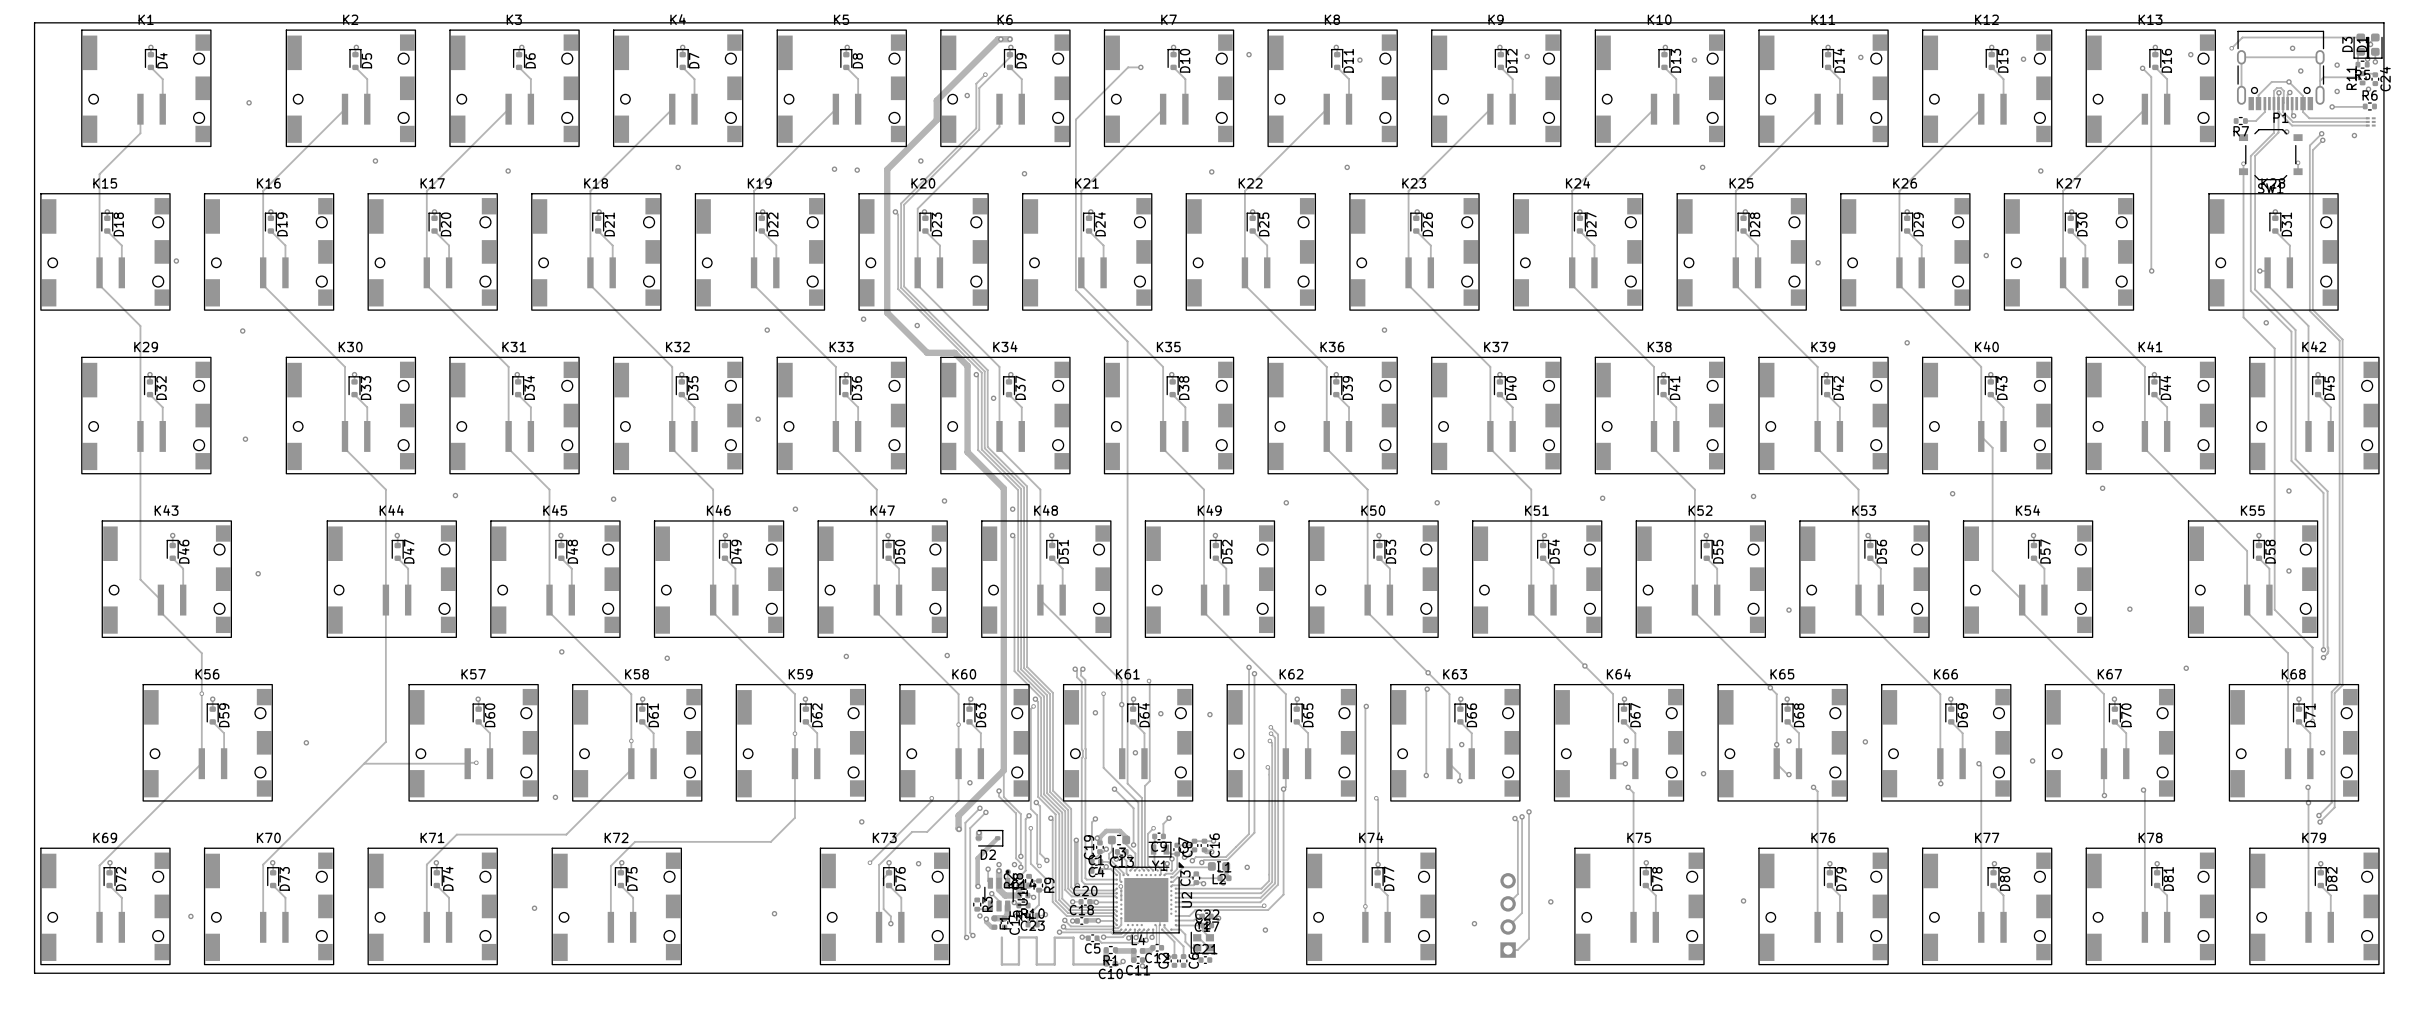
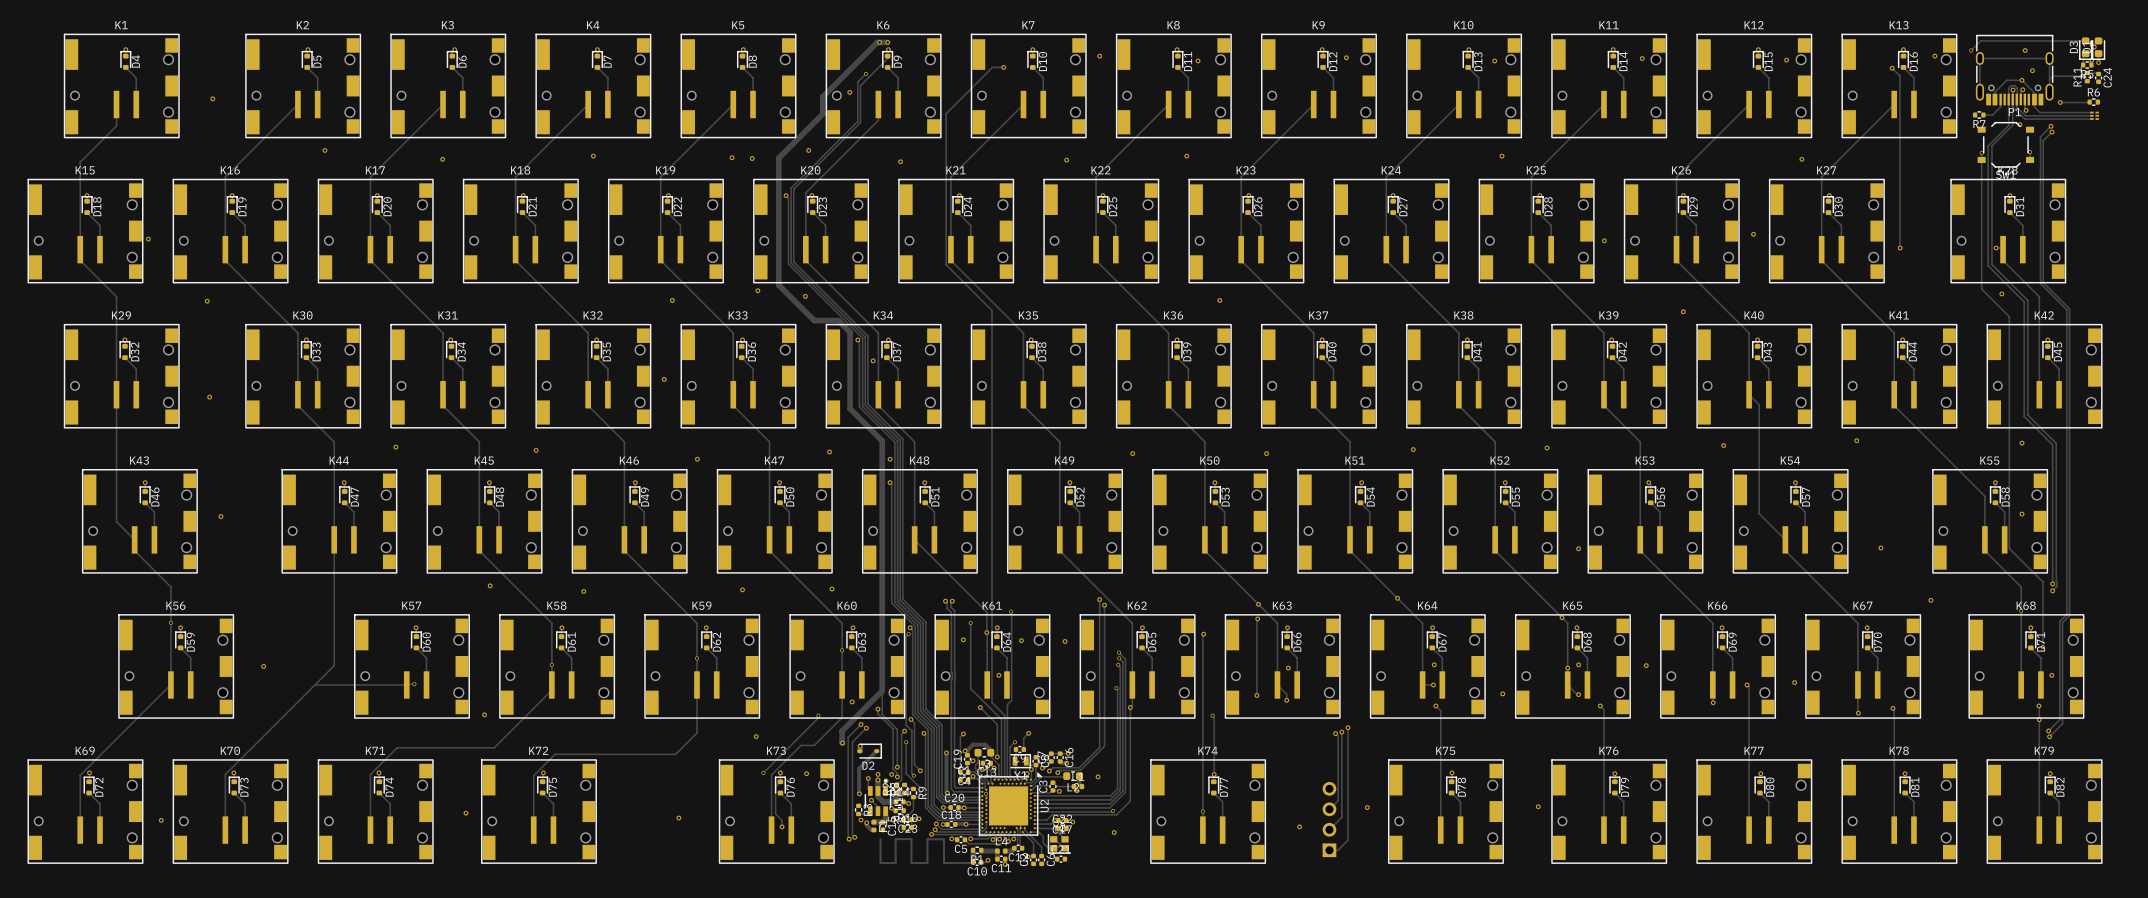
board edge: (34, 22) (2383, 22) (2383, 973) (34, 973) (34, 22) -> none
via: (2337, 65) -> none
via: (2368, 89) -> none
via: (2337, 91) -> none
via: (2354, 135) -> none

